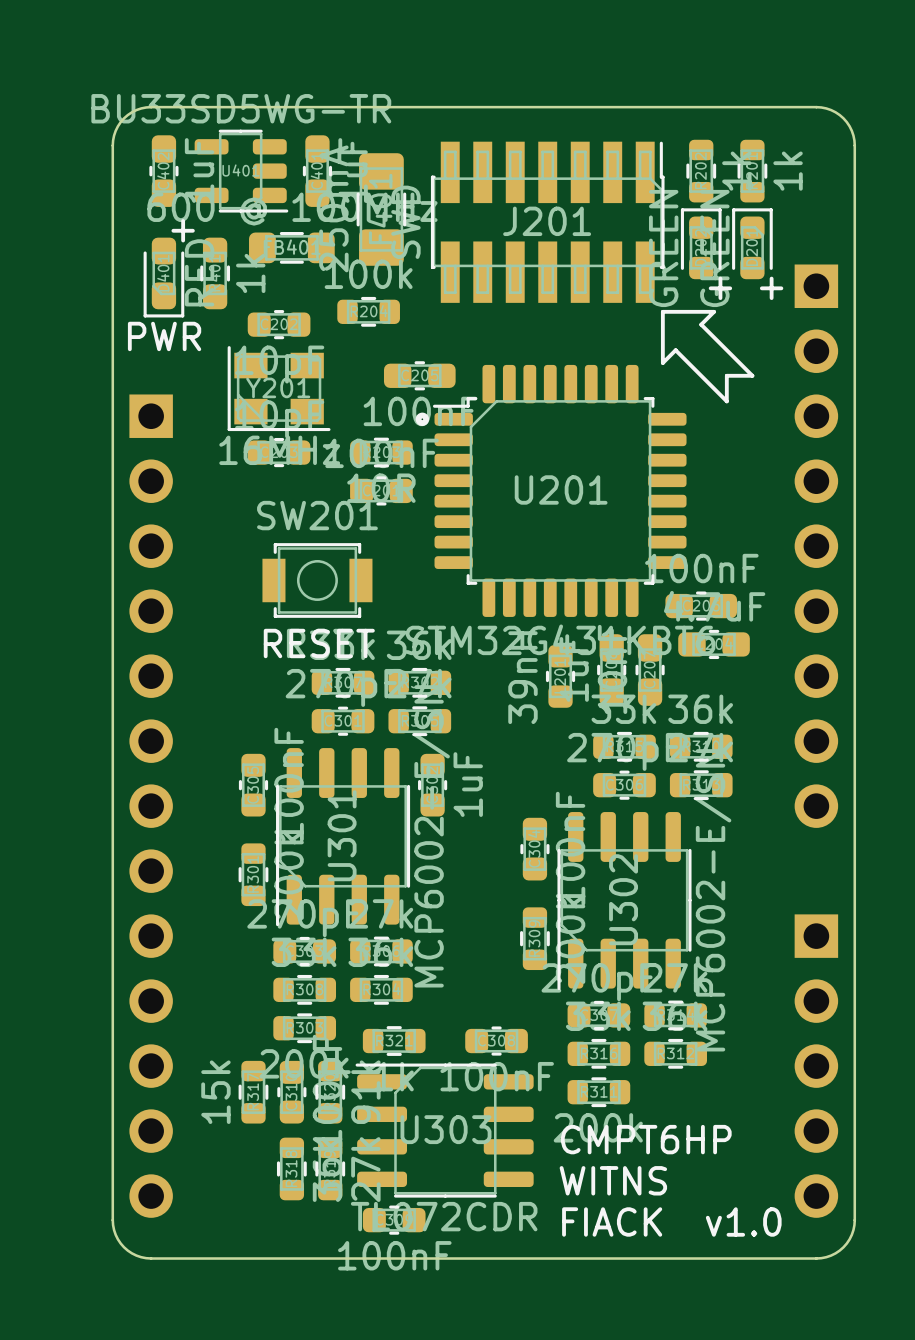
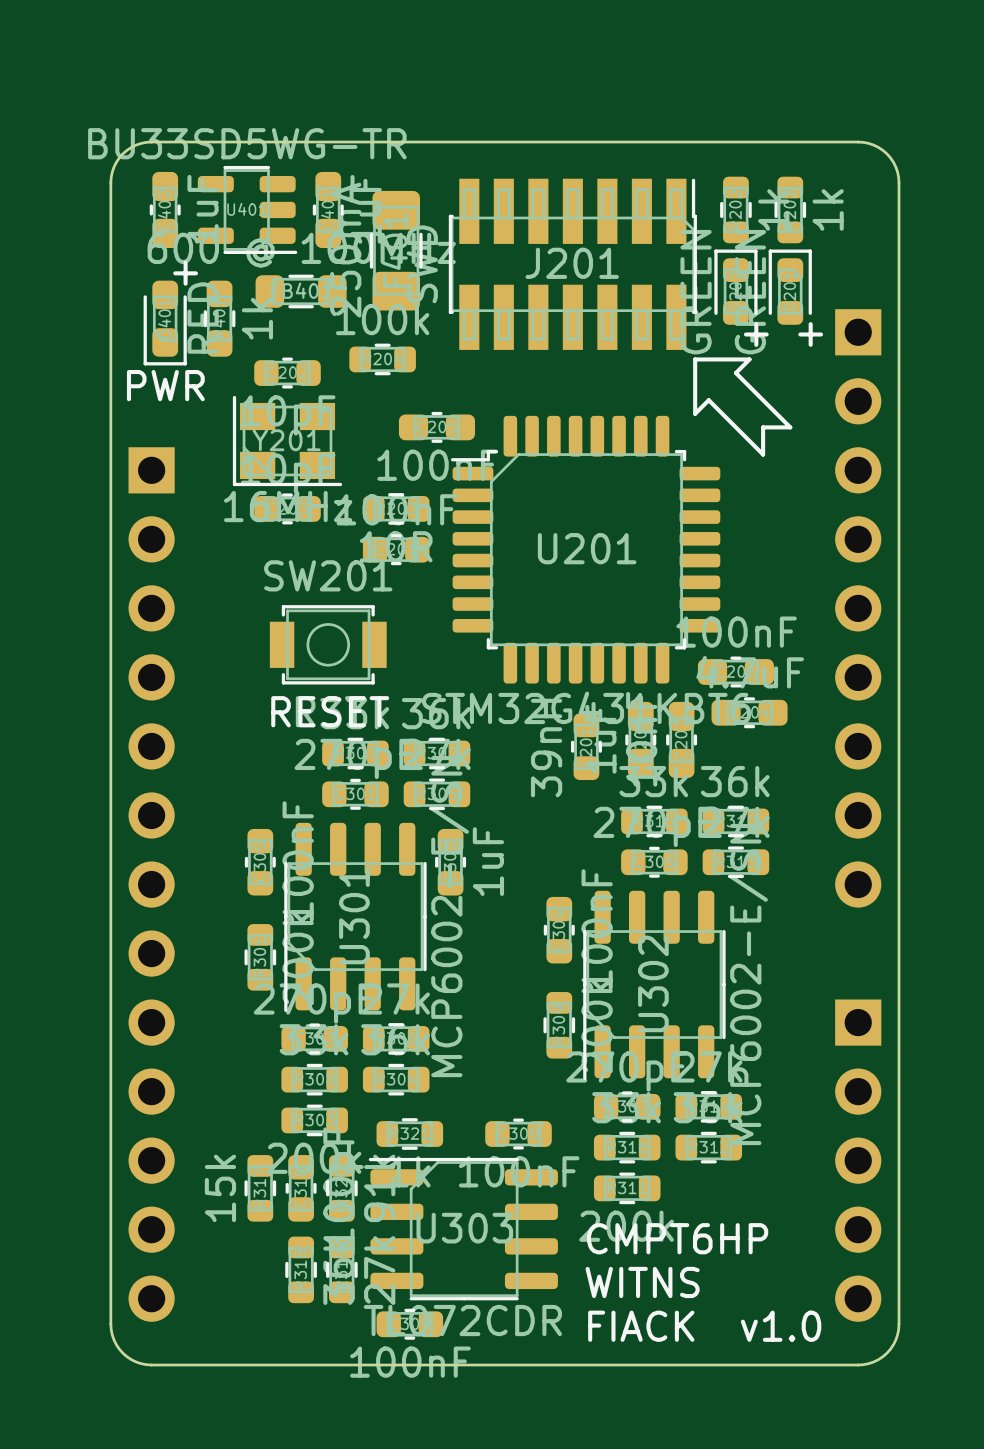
drawing: [415, 412, 430, 426] -> none

